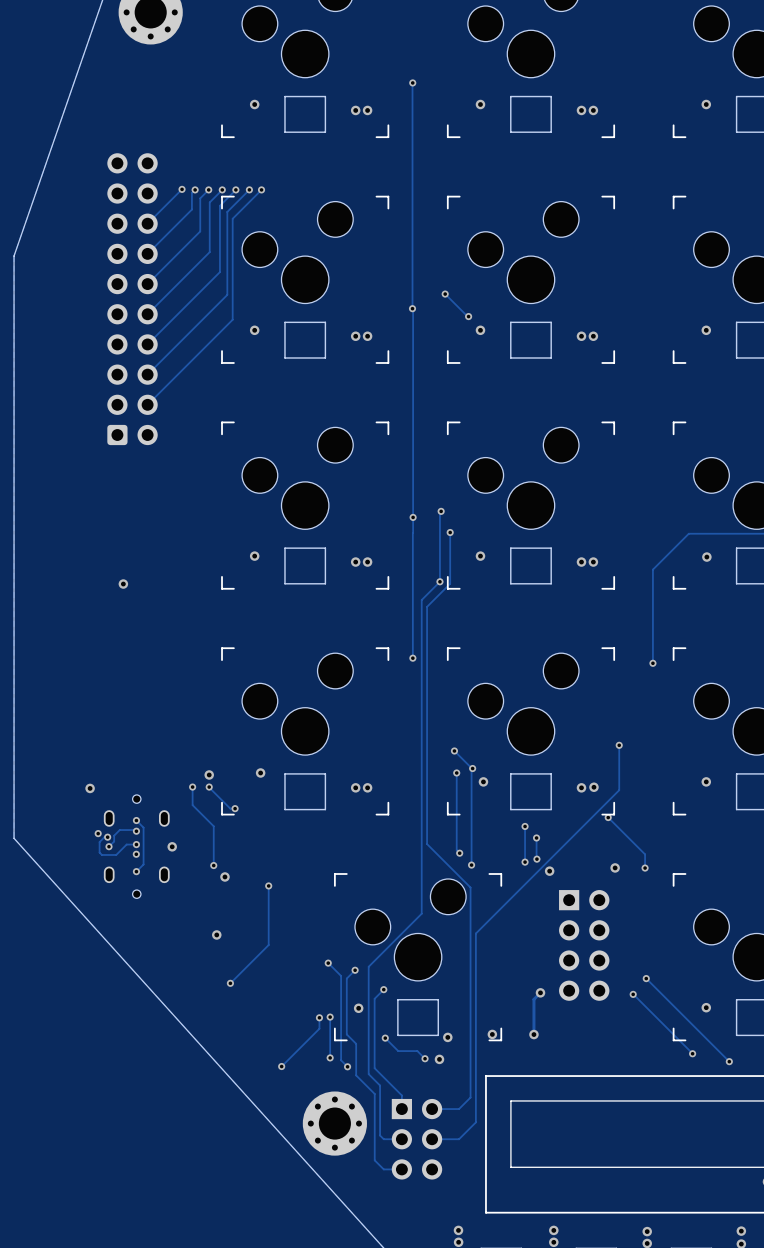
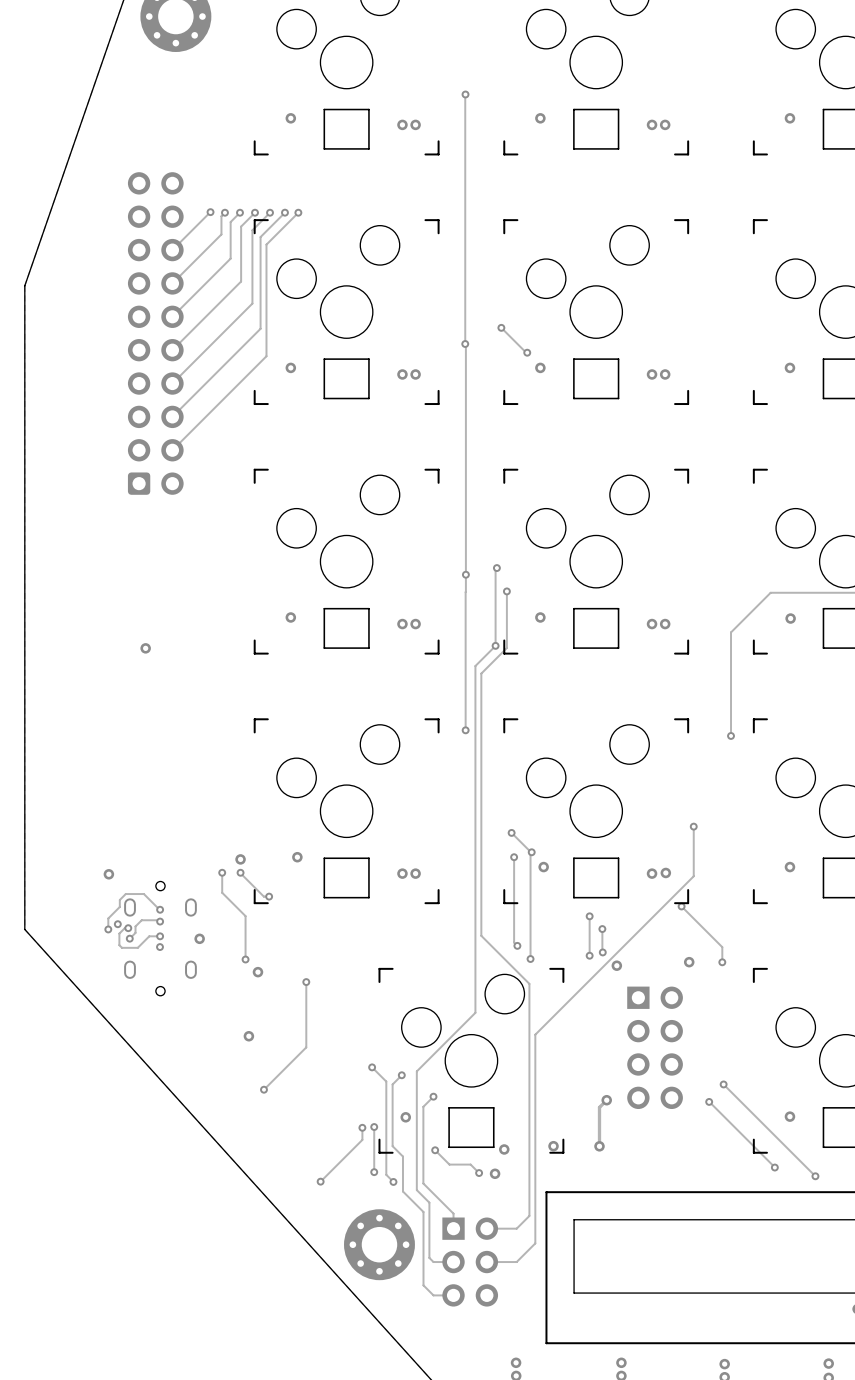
track: (136, 820) (143, 827) (143, 864) (136, 871) -> (159, 909) (143, 894) (125, 894) (119, 899) (119, 906) (108, 918) (108, 929)
via position: (136, 871) -> (108, 929)

